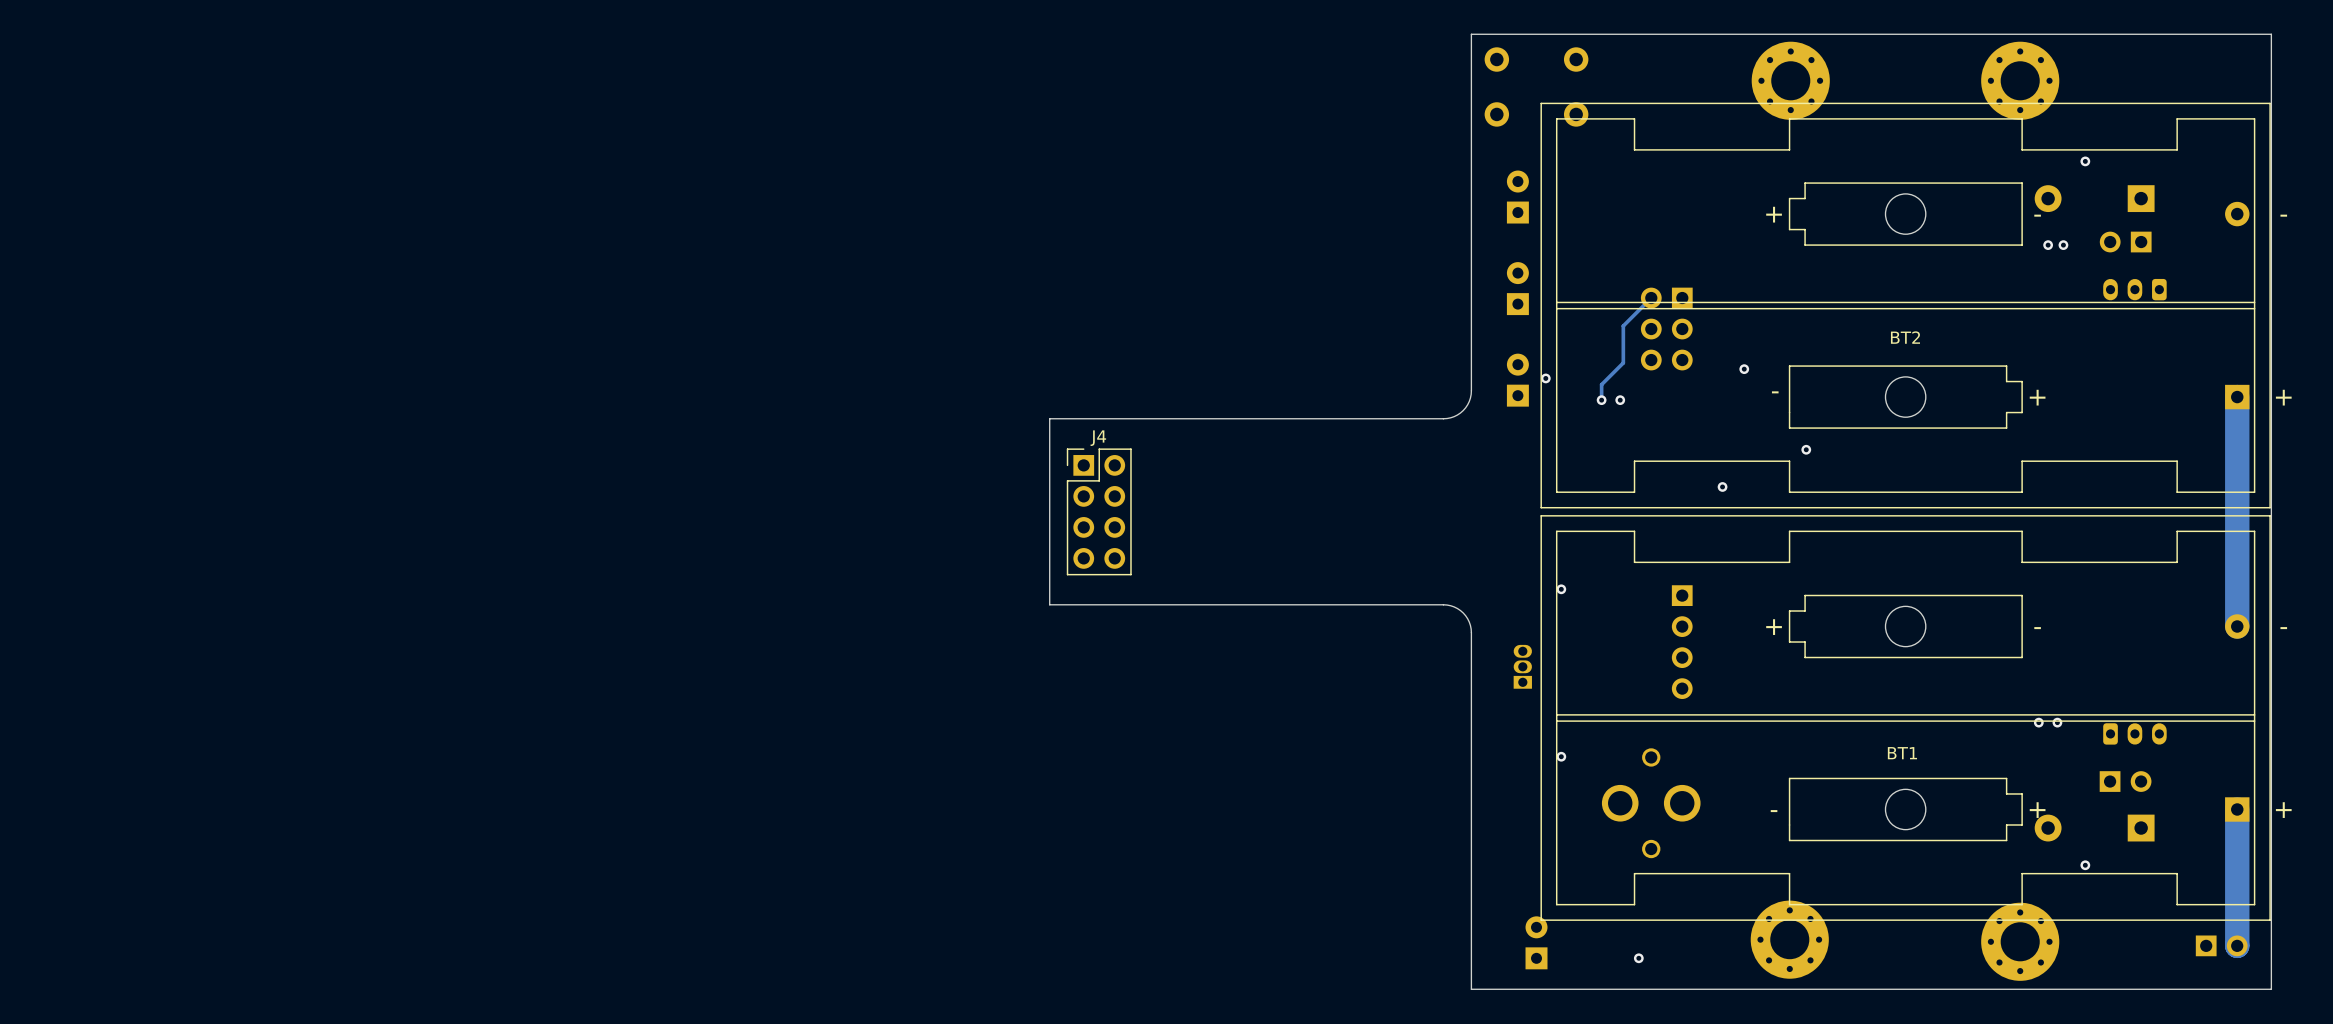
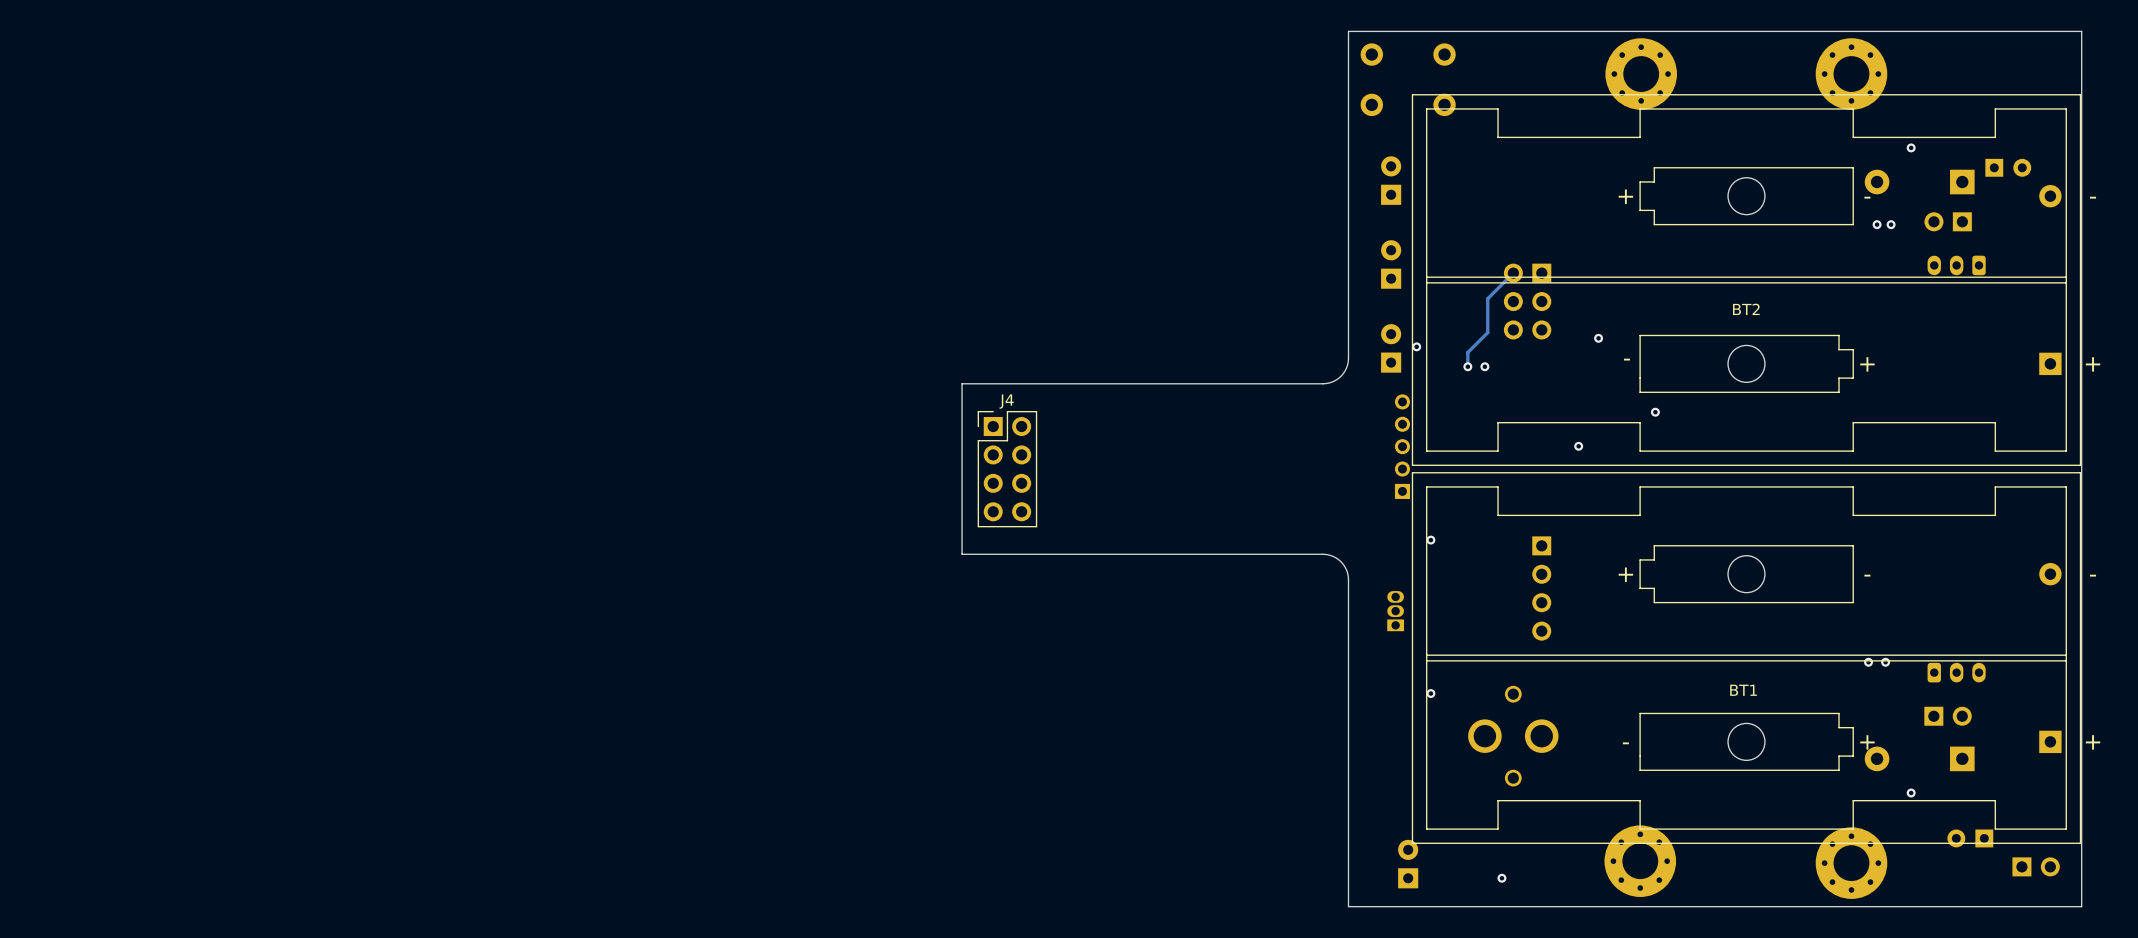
part: none -> (2008, 167)
track: (2237, 397) (2237, 626) -> none
part: none -> (1402, 446)
track: (2237, 809) (2237, 945) -> none
part: none -> (1970, 838)

